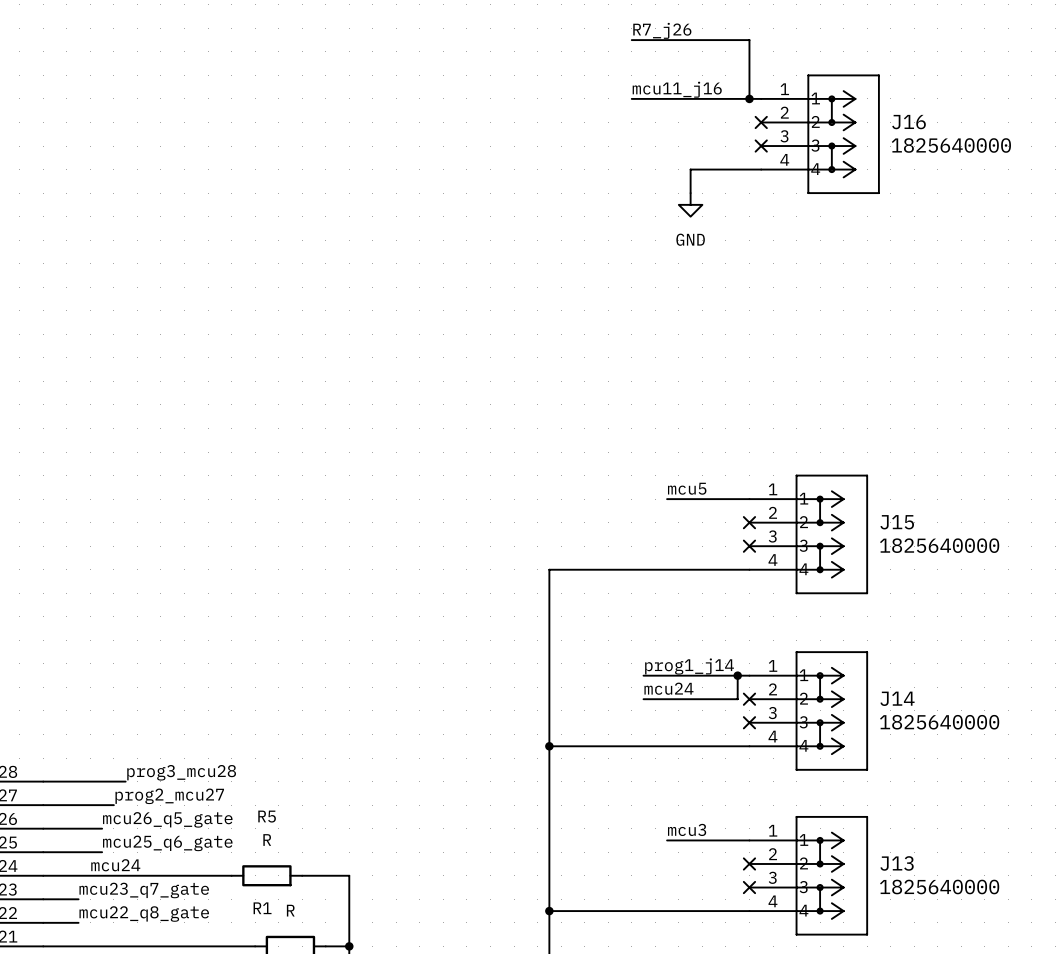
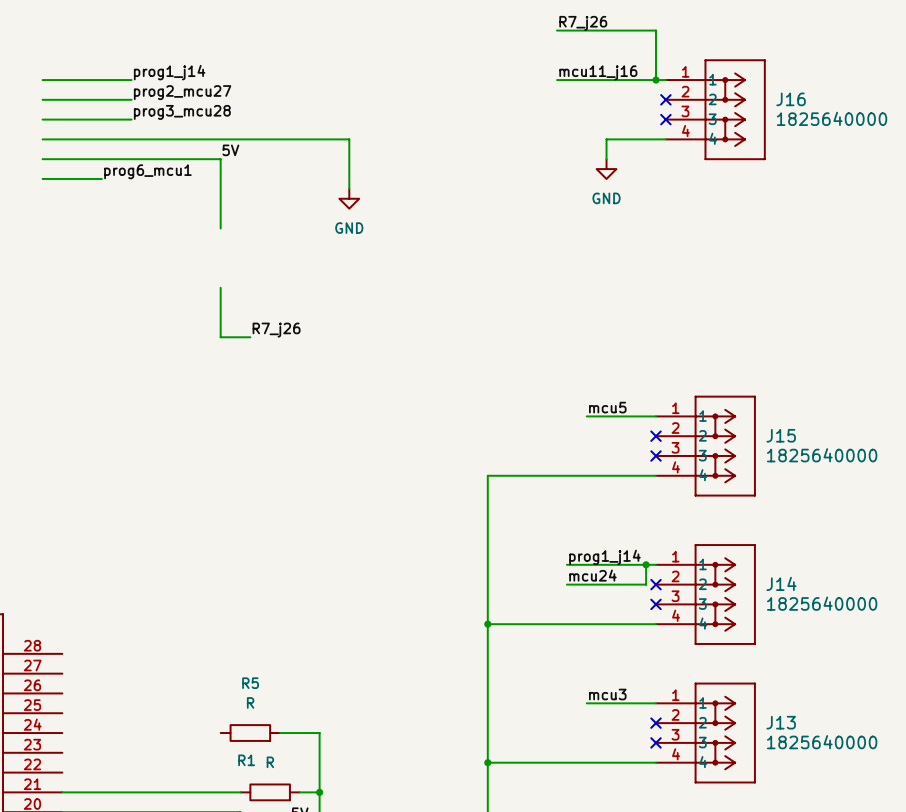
label: none -> prog1_j14 (169, 72)
wire: none -> (42, 80) (131, 80)
label: none -> prog2_mcu27 (182, 92)
wire: none -> (42, 99) (131, 99)
label: none -> prog3_mcu28 (182, 112)
wire: none -> (42, 119) (131, 119)
wire: none -> (42, 139) (349, 139) (349, 188)
label: none -> 5V (230, 150)
wire: none -> (42, 159) (220, 159) (220, 228)
label: none -> prog6_mcu1 (147, 171)
wire: none -> (42, 178) (101, 178)
power symbol: none -> GND (349, 198)
wire: none -> (220, 287) (220, 337) (250, 337)
label: none -> R7_j26 (276, 330)
label: prog3_mcu28 (181, 772) -> none
wire: (43, 781) (125, 781) -> none
label: prog2_mcu27 (169, 796) -> none
wire: (43, 805) (113, 805) -> none
label: mcu26_q5_gate (167, 819) -> none
wire: (43, 828) (102, 828) -> none
label: mcu25_q6_gate (167, 843) -> none
wire: (43, 852) (102, 852) -> none
label: mcu24 (115, 865) -> none
wire: (43, 875) (231, 875) -> none
label: mcu23_q7_gate (144, 890) -> none
wire: (43, 899) (78, 899) -> none
label: mcu22_q8_gate (144, 914) -> none
wire: (43, 922) (78, 922) -> none

